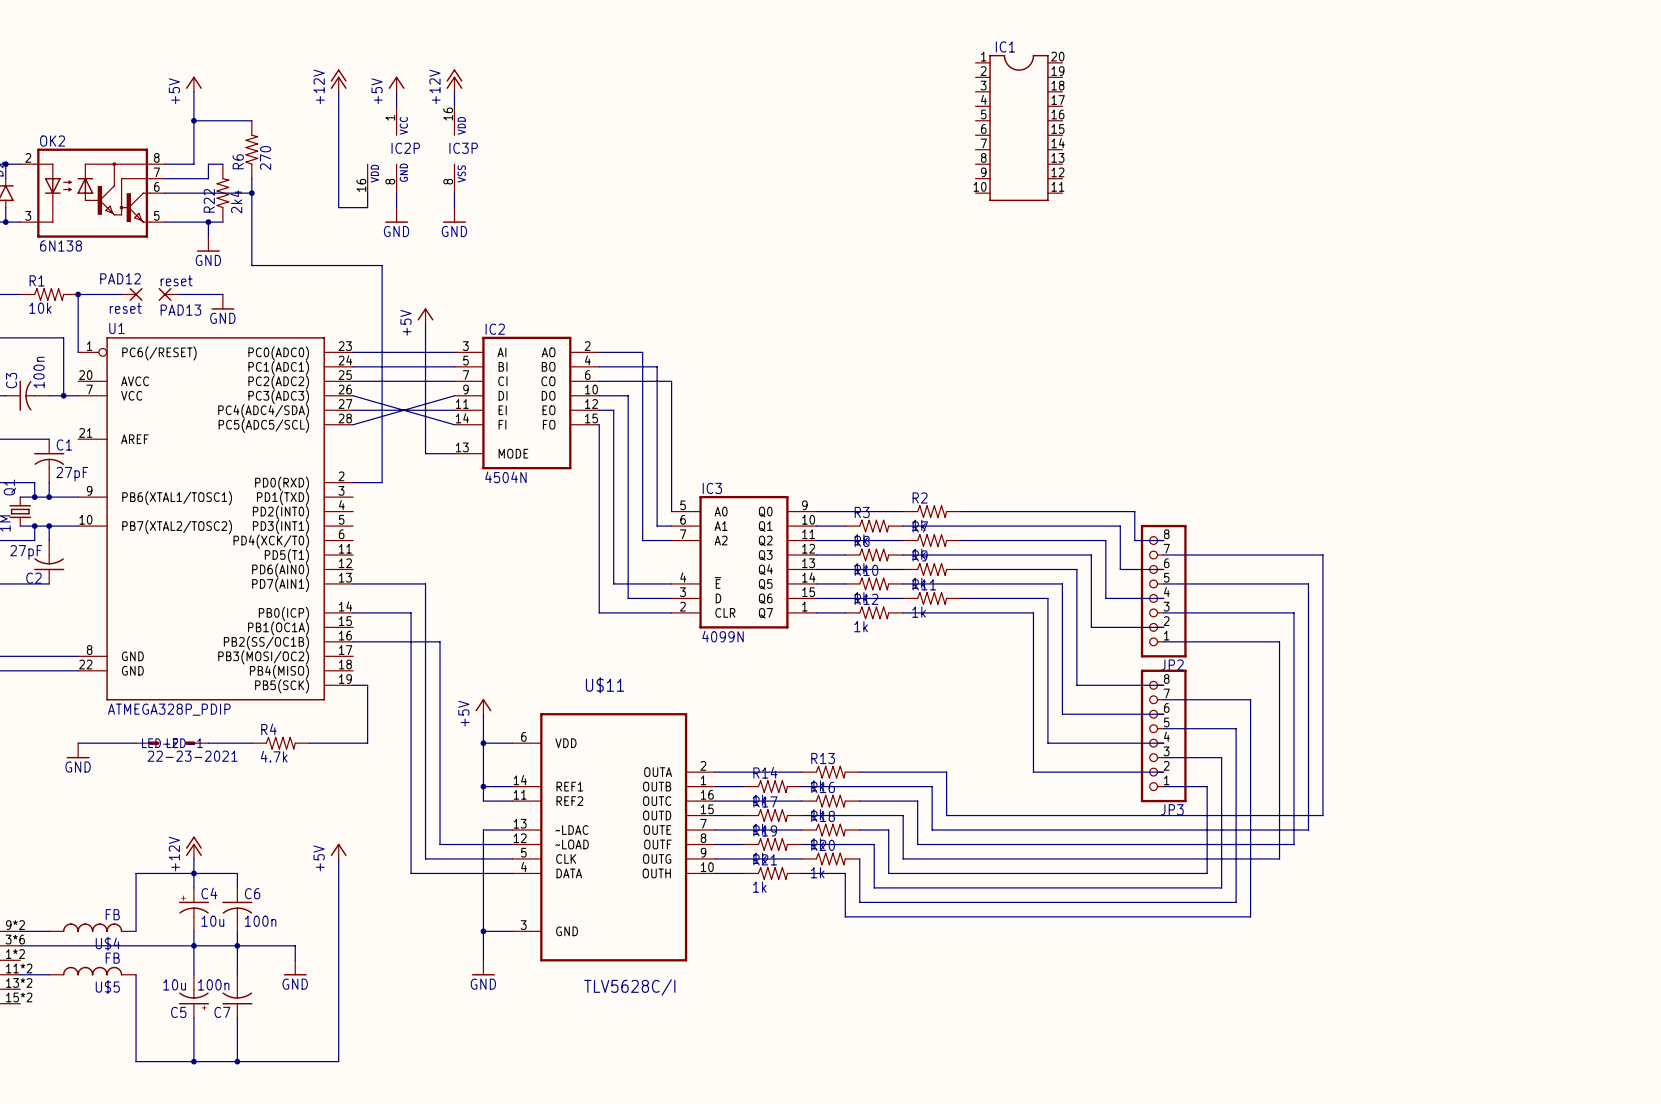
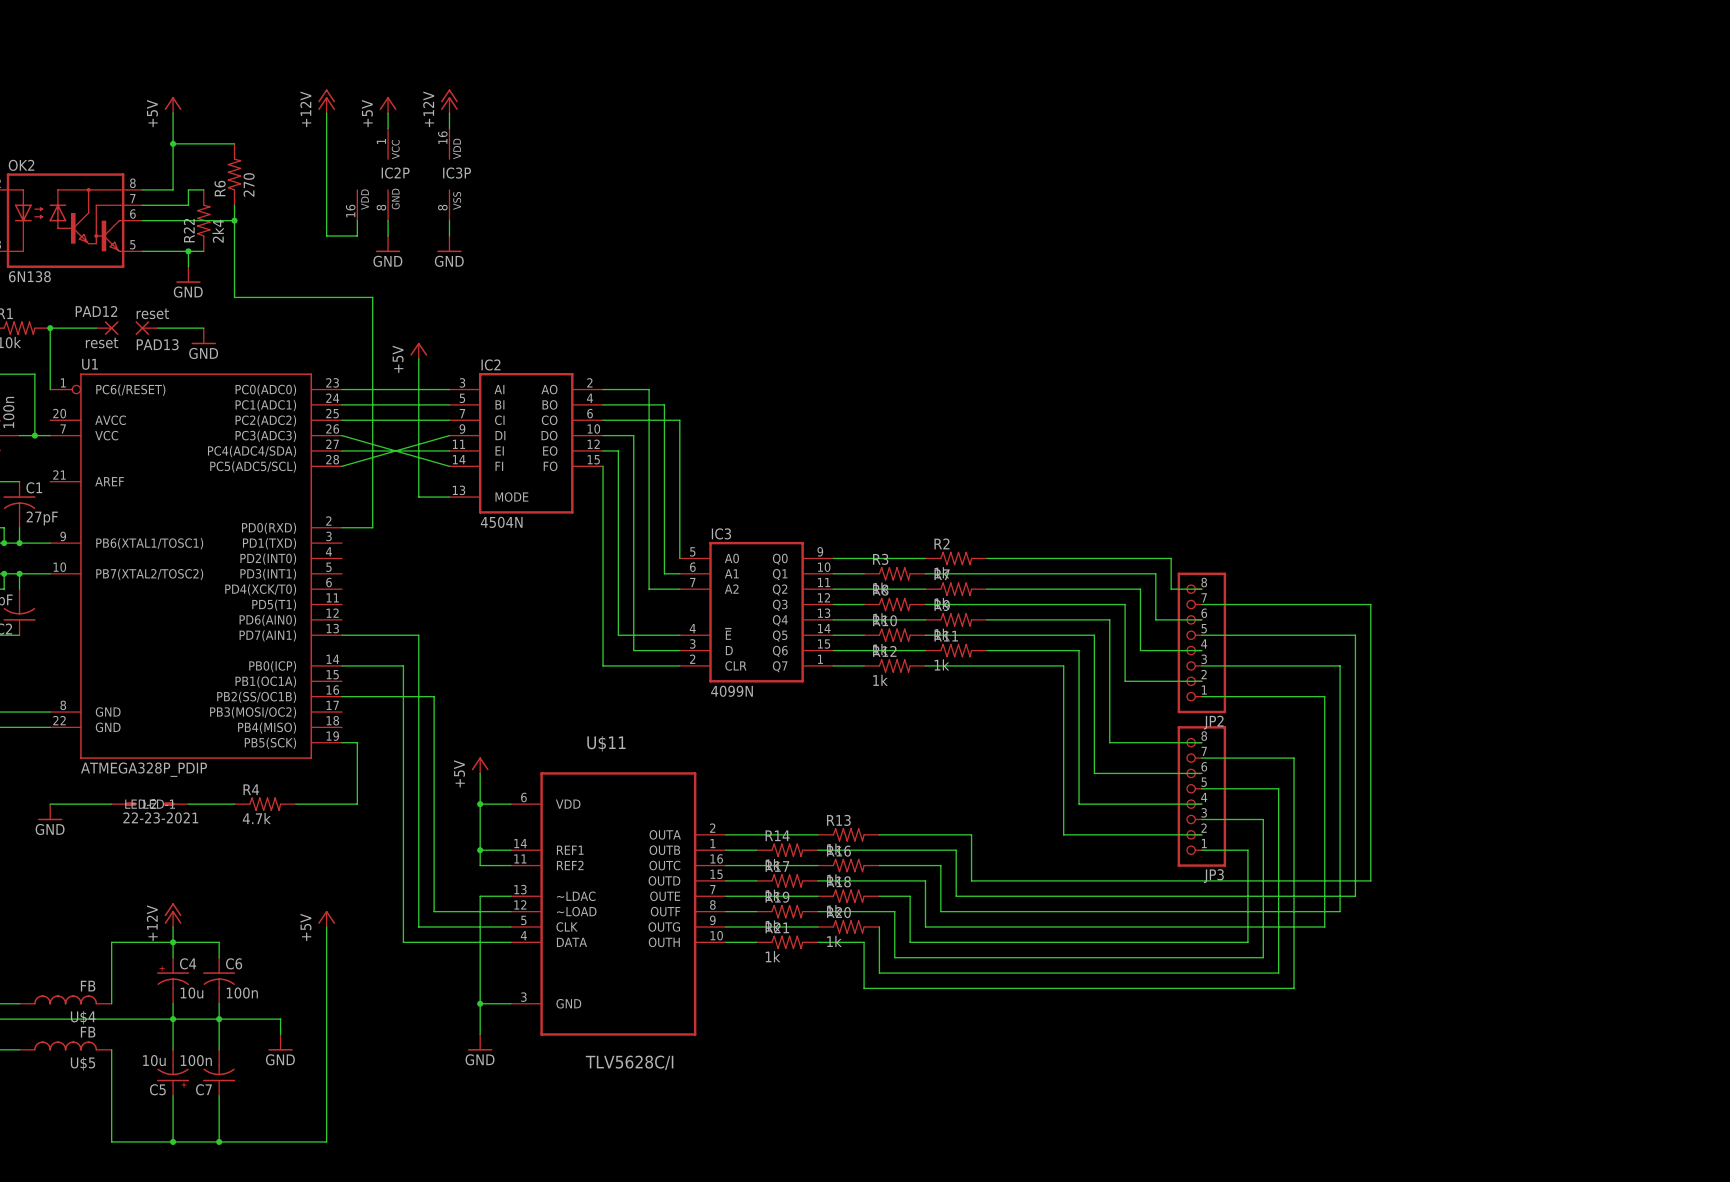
IC1: (1018, 128) -> none

